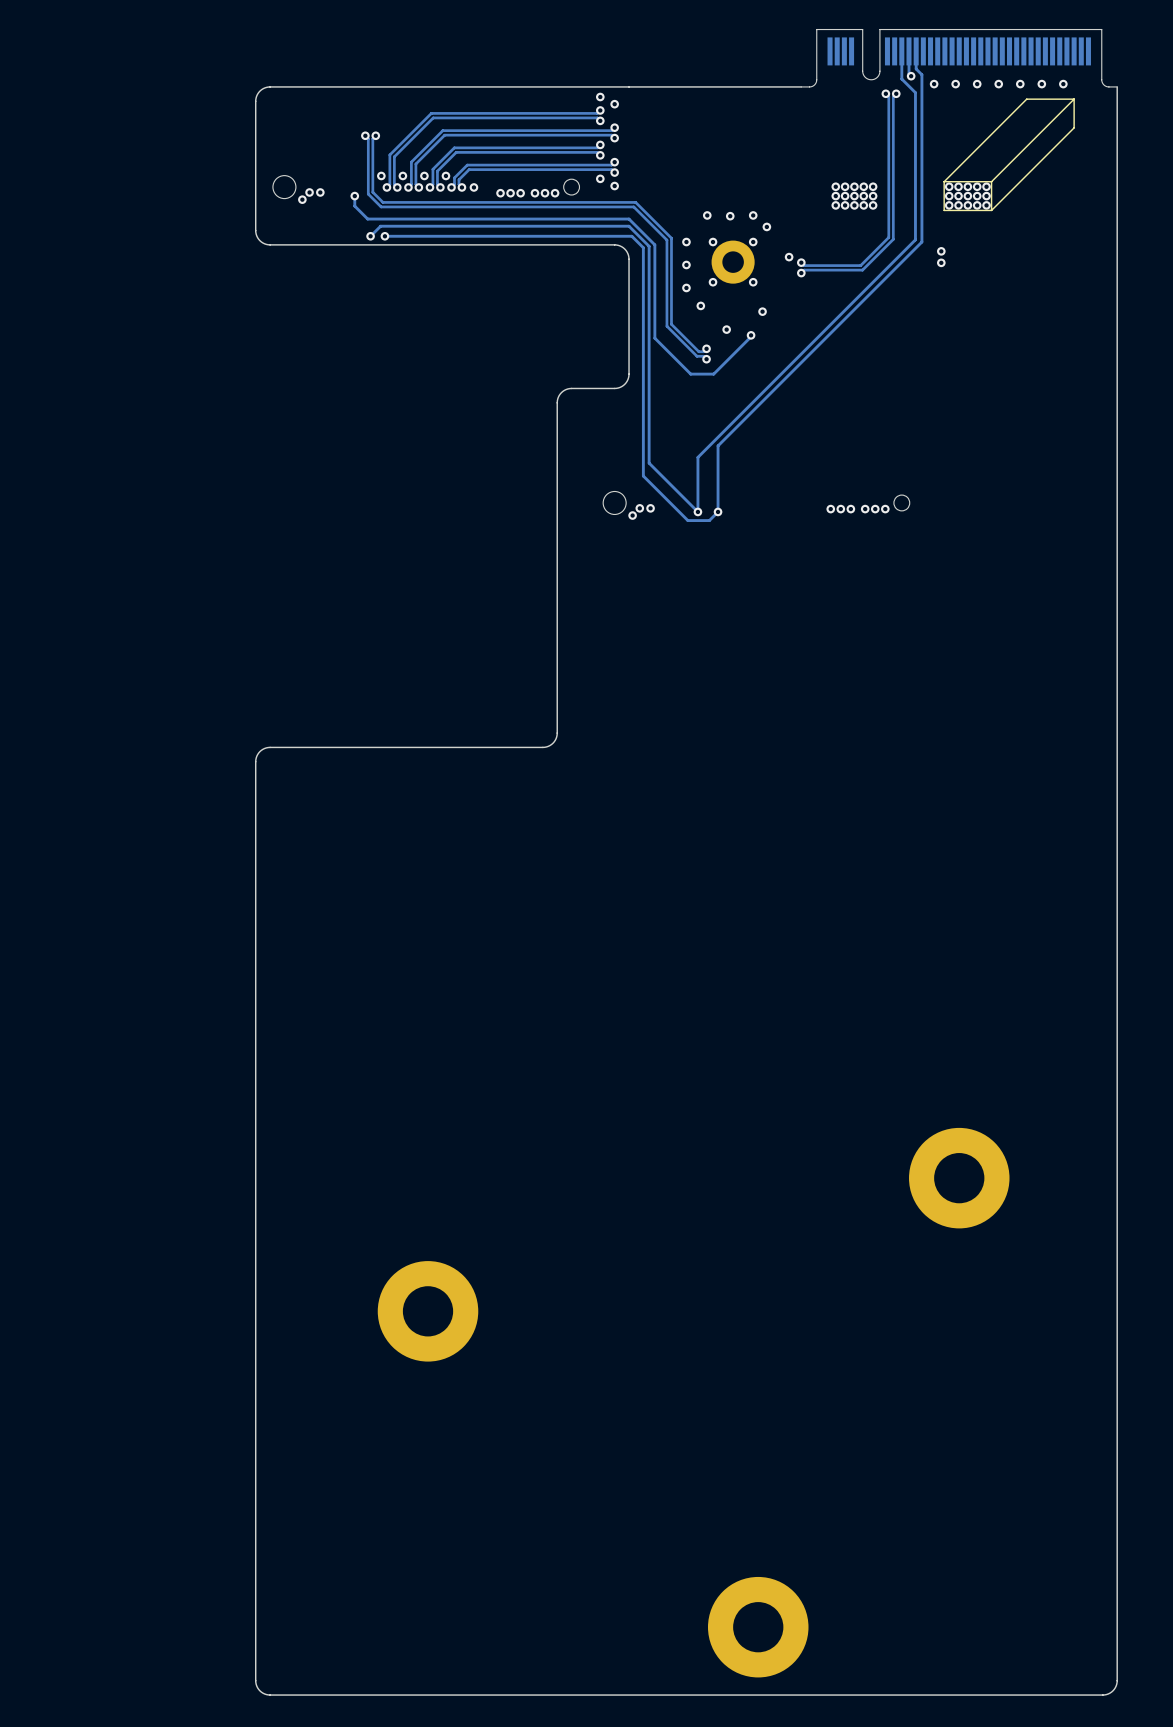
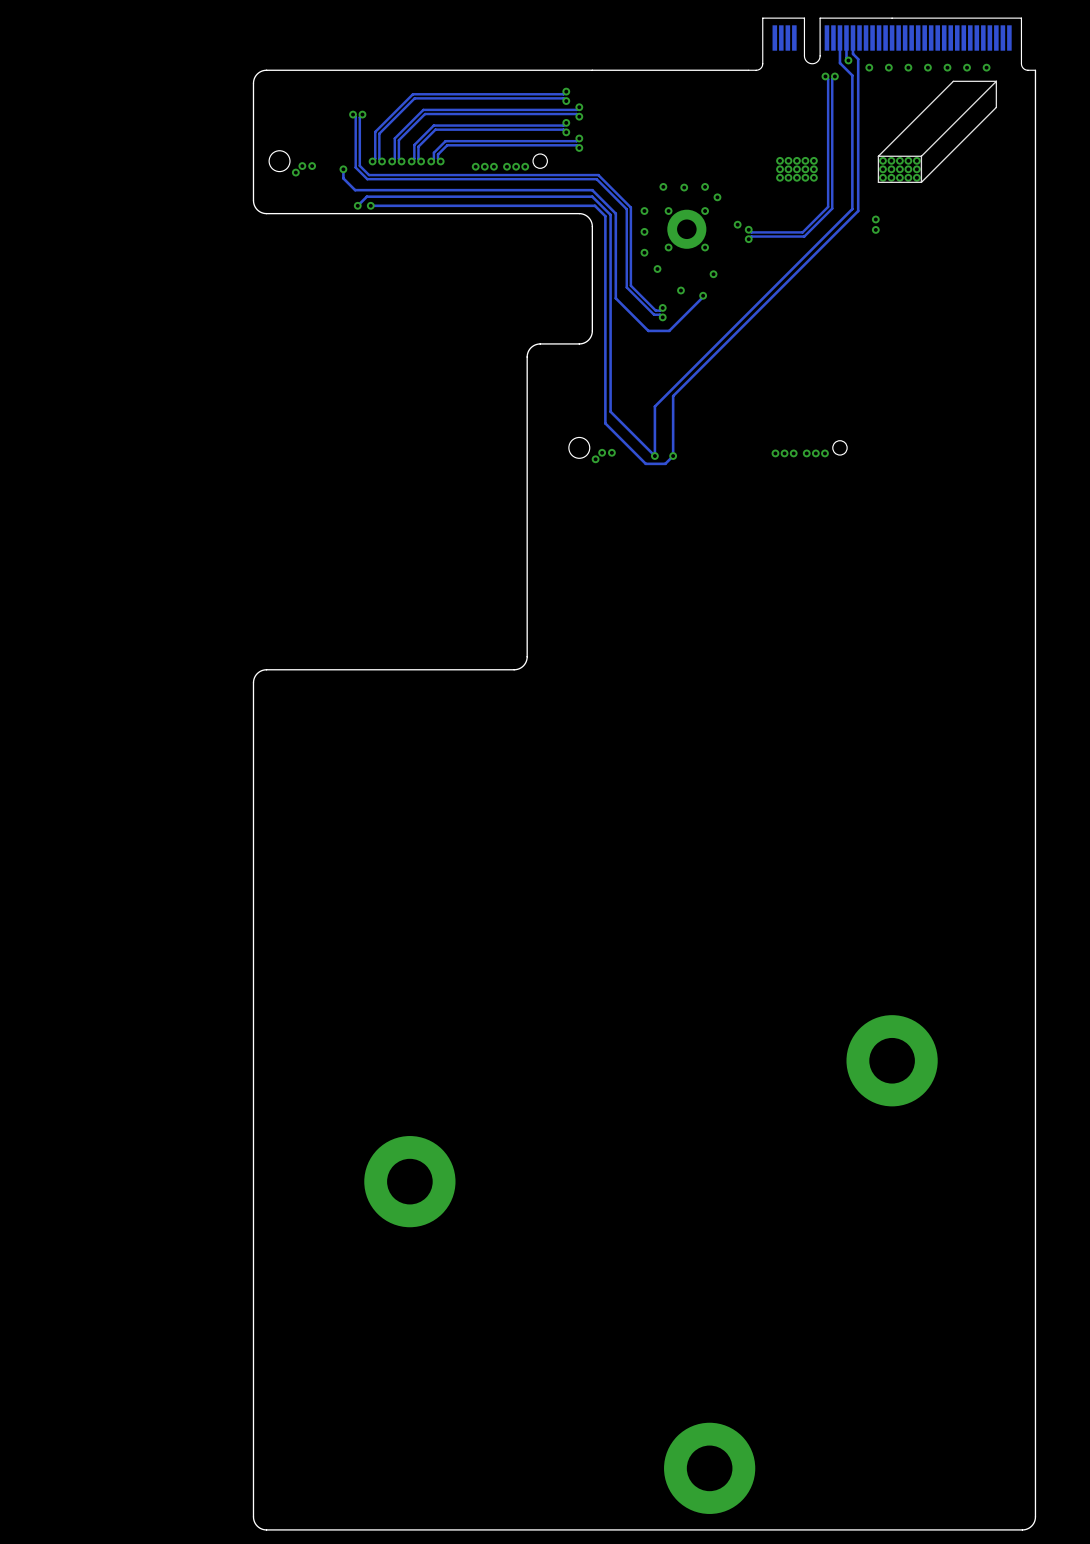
via: (600, 97) -> none
via: (614, 104) -> none
via: (381, 175) -> none
via: (402, 175) -> none
via: (424, 175) -> none
via: (445, 175) -> none
via: (600, 178) -> none
via: (614, 186) -> none
via: (473, 187) -> none

